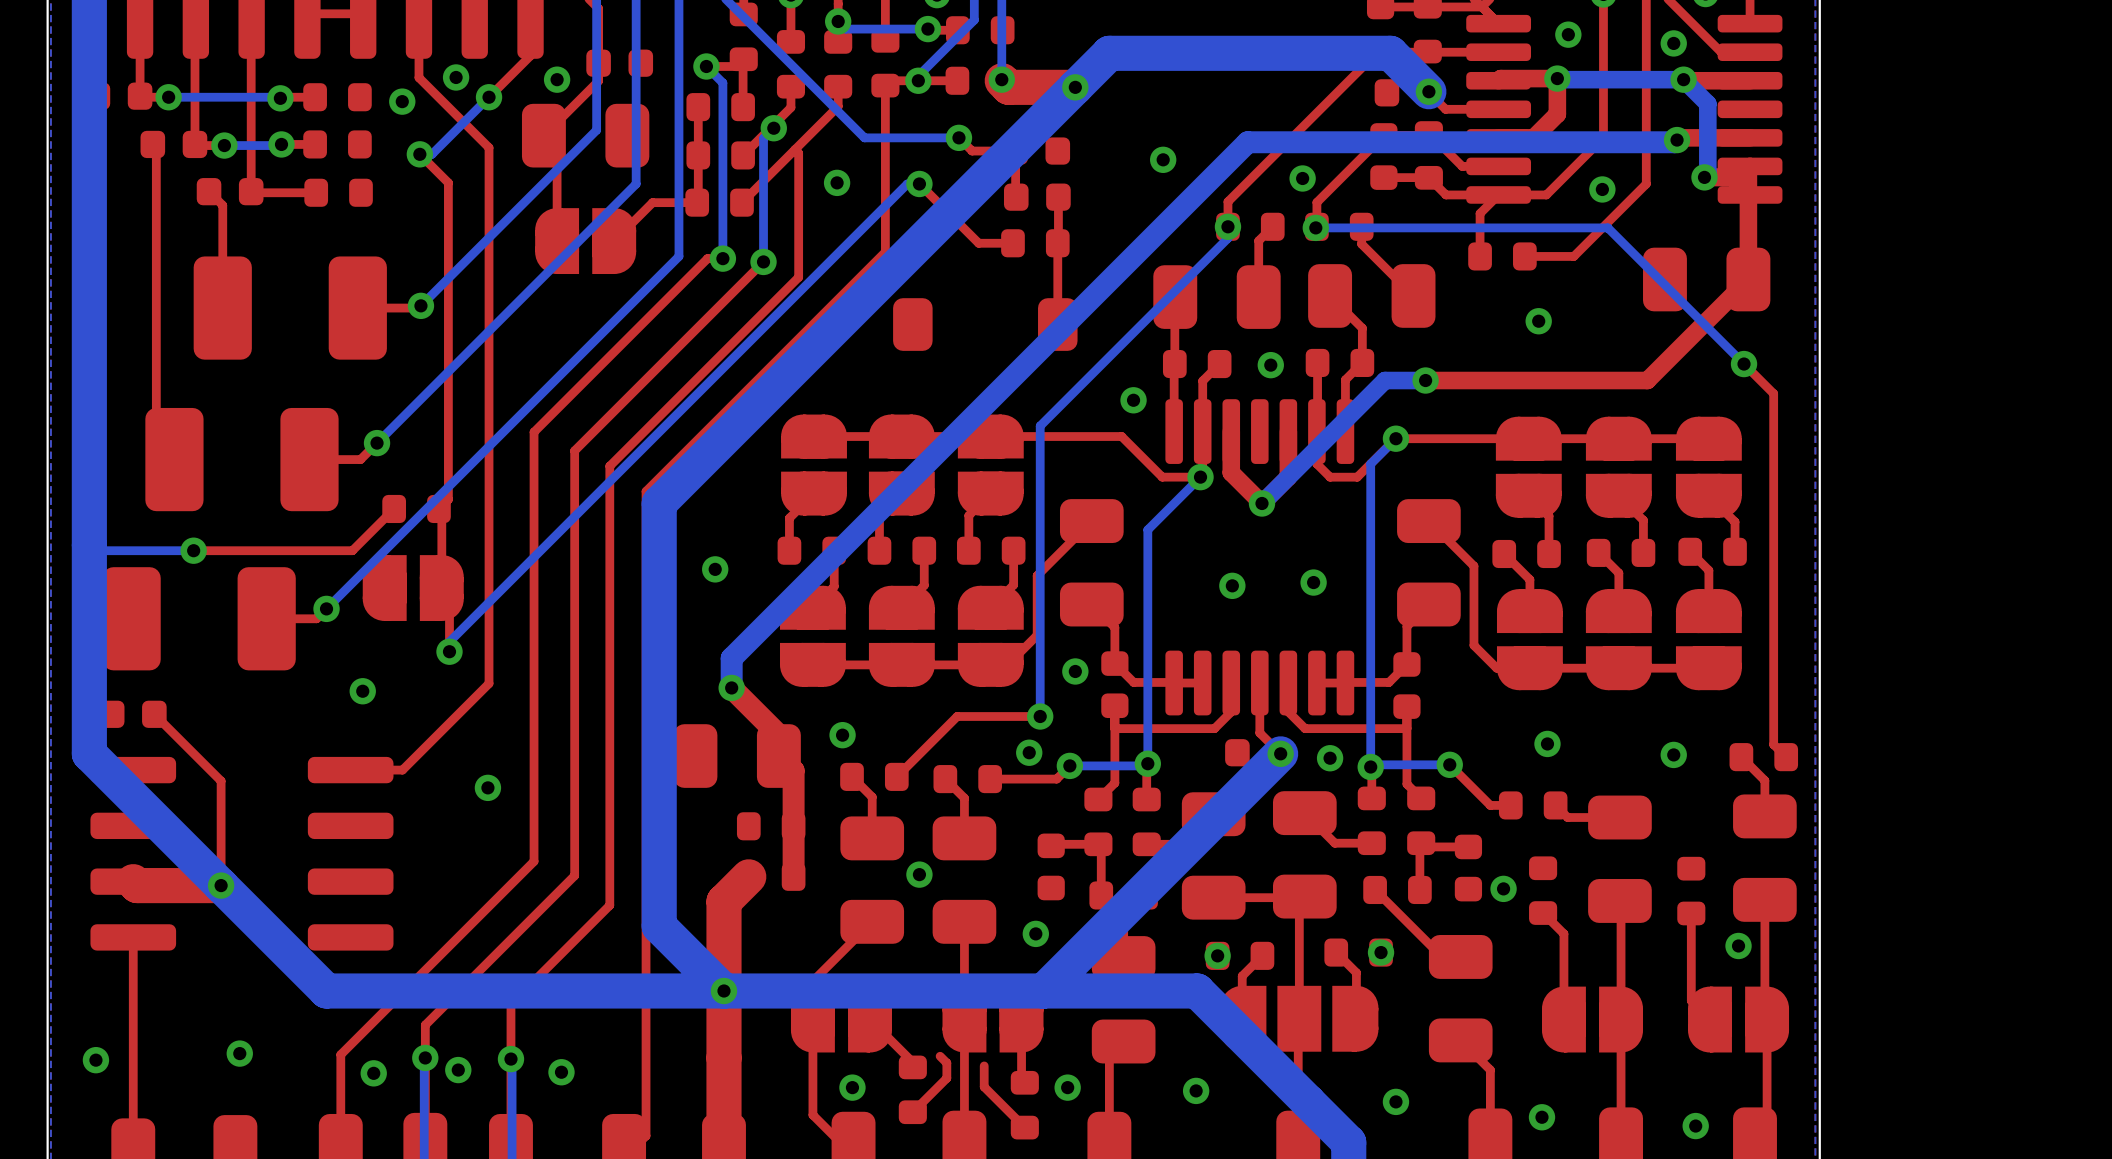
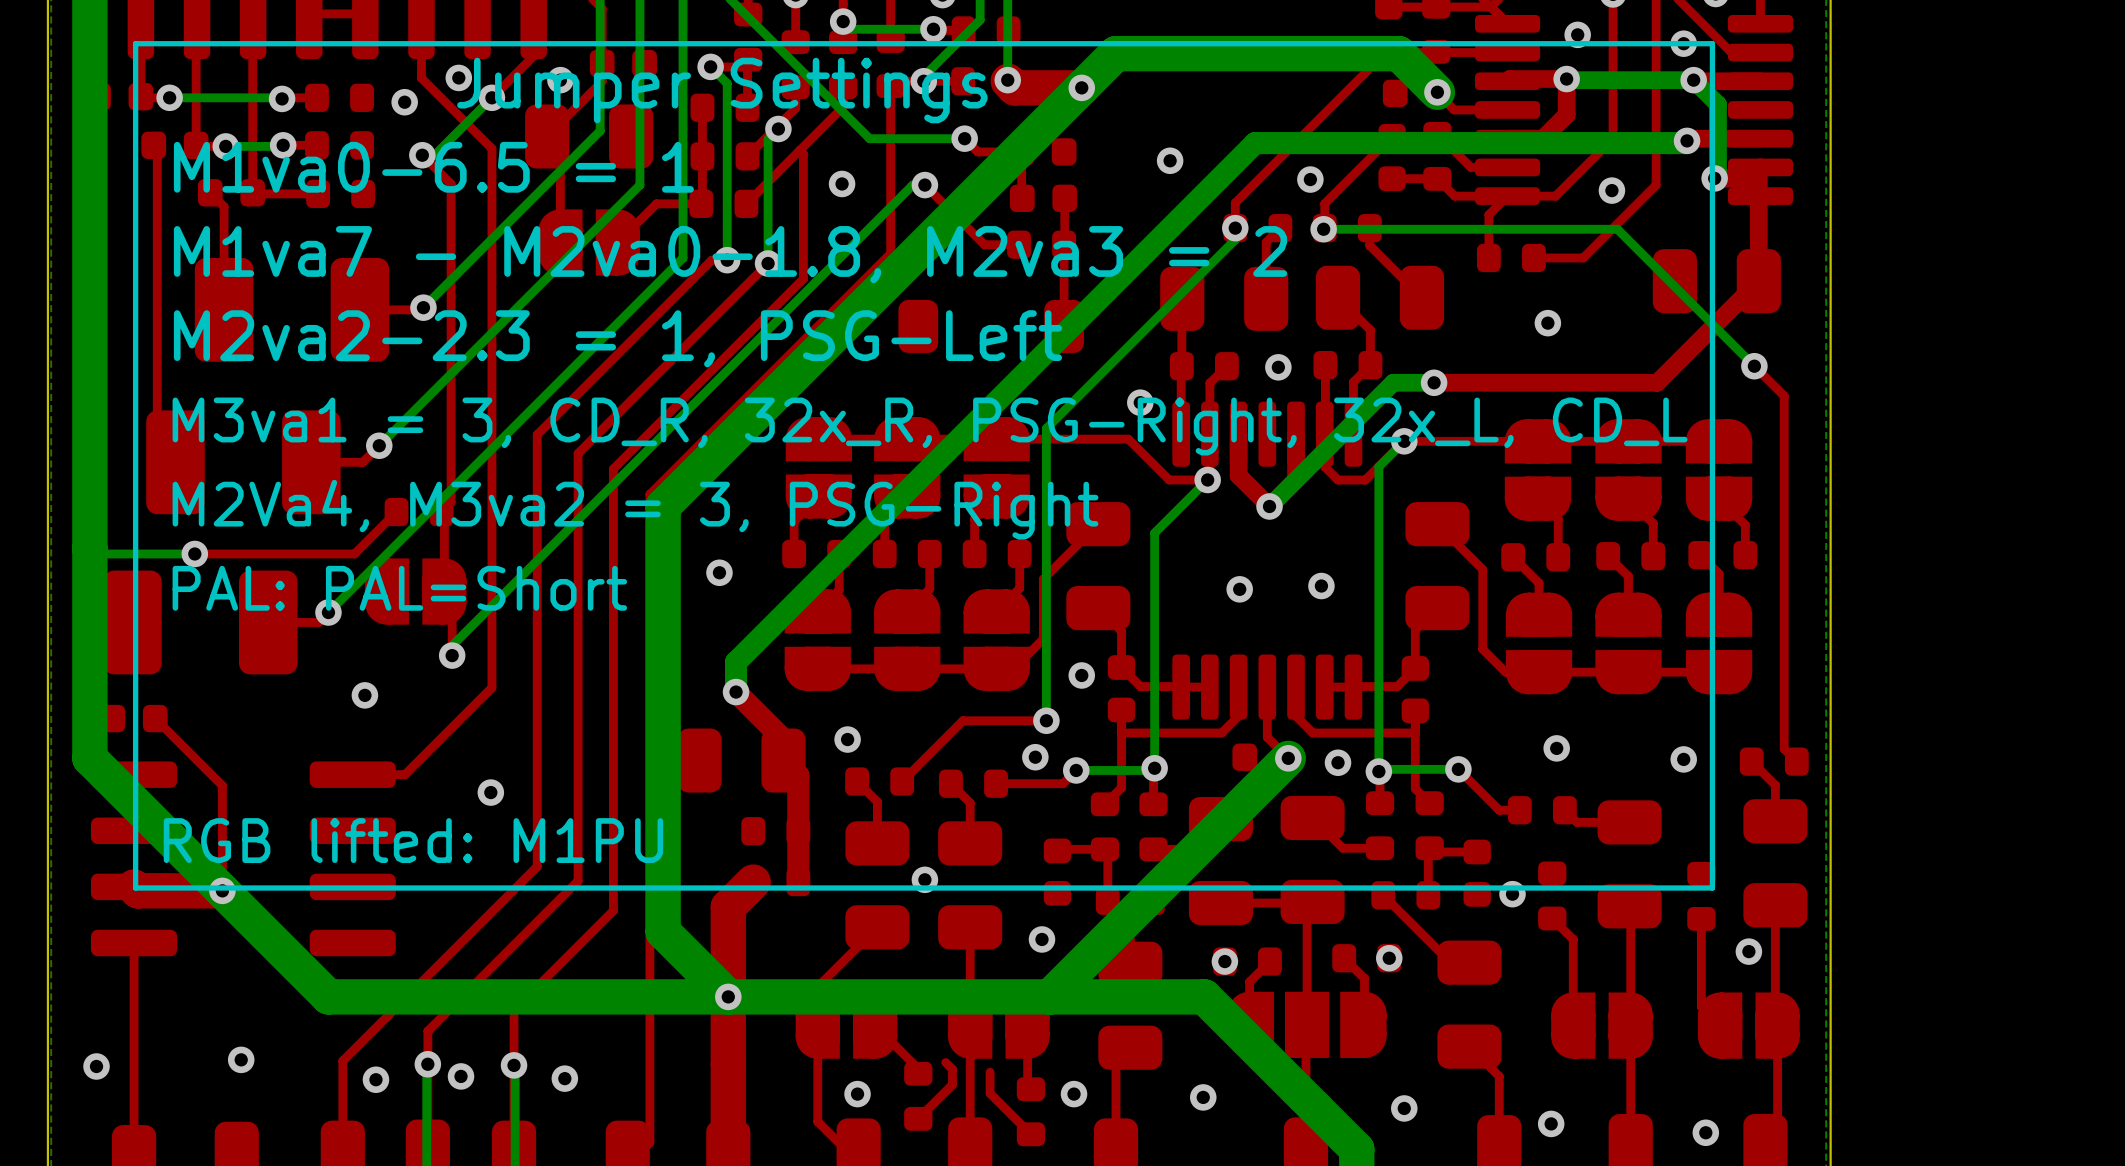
line: none -> (1712, 43) (135, 43) (135, 887) (1712, 887) (1712, 43)
text: none -> Jumper Settings (722, 90)
text: none -> M1va0-6.5 = 1 (433, 167)
text: none -> M1va7 - M2va0-1.8, M2va3 = 2 (730, 254)
text: none -> M2va2-2.3 = 1, PSG-Left (617, 338)
text: none -> M3va1 = 3, CD_R, 32x_R, PSG-Right, 32x_L, CD_L (930, 426)
text: none -> M2Va4, M3va2 = 3, PSG-Right (635, 509)
text: none -> PAL: PAL=Short (399, 588)
text: none -> RGB lifted: M1PU (413, 840)

